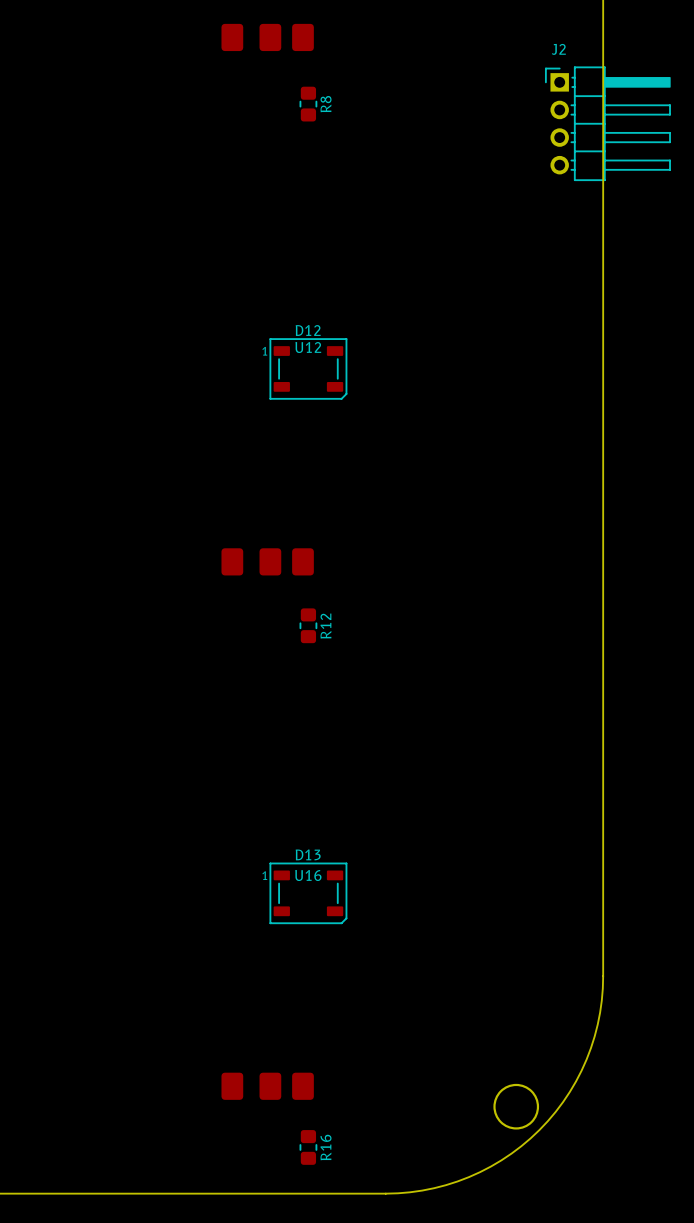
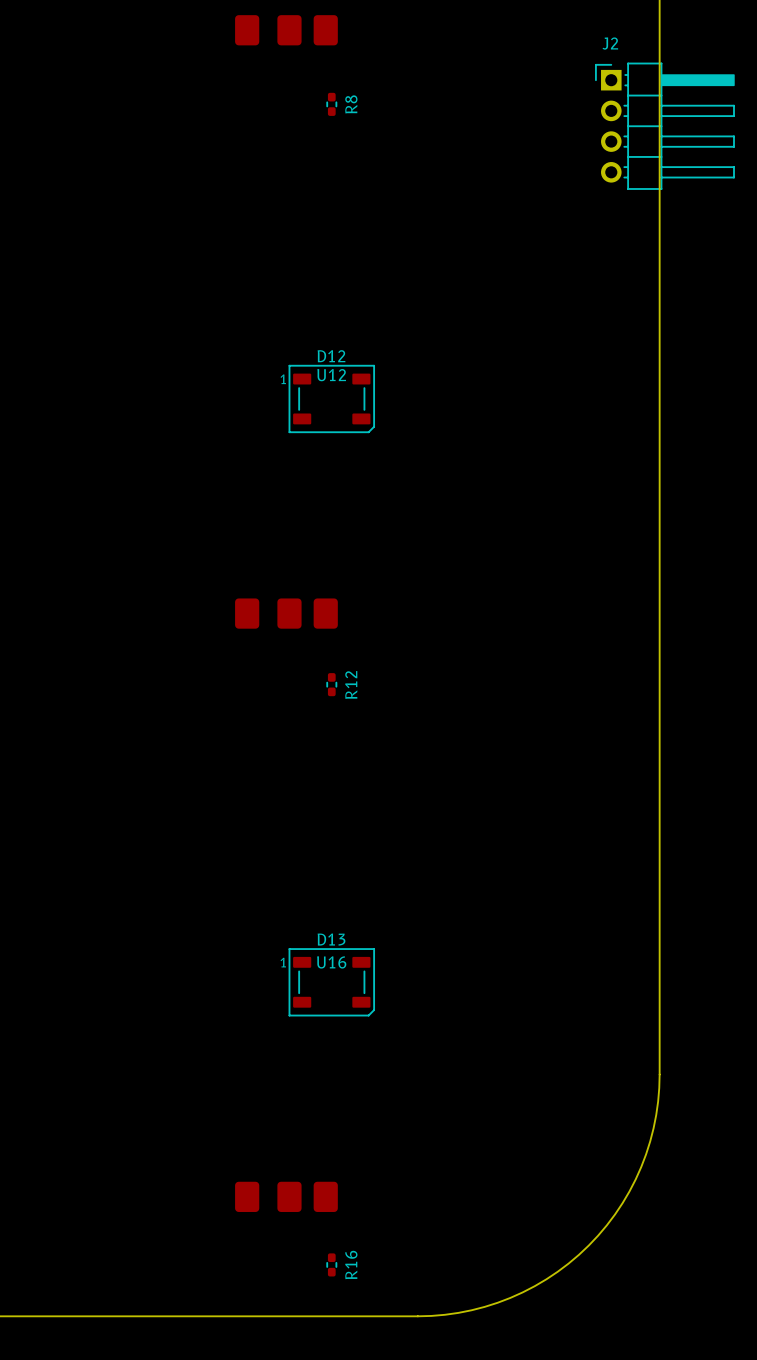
R8 footprint: [299, 86, 318, 122] -> [326, 92, 338, 116]
R12 footprint: [299, 608, 318, 644] -> [326, 673, 338, 697]
round board edge: [493, 1083, 540, 1130] -> none
R16 footprint: [299, 1130, 318, 1165] -> [326, 1253, 338, 1277]

